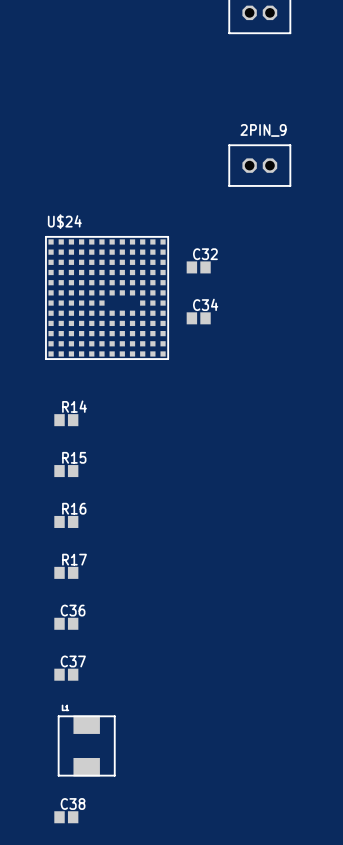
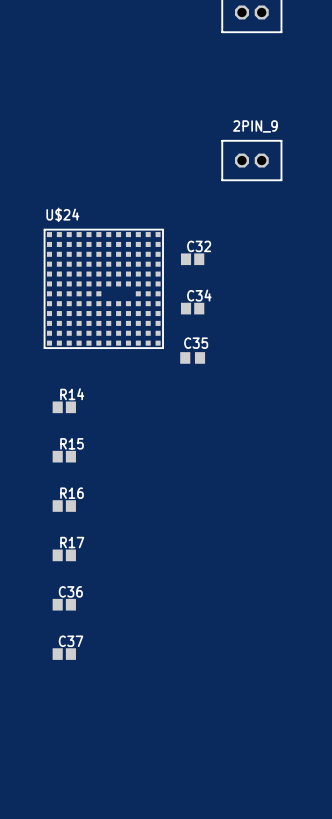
C35: none -> (192, 357)
part: (86, 745) -> none
C38: (66, 817) -> none

